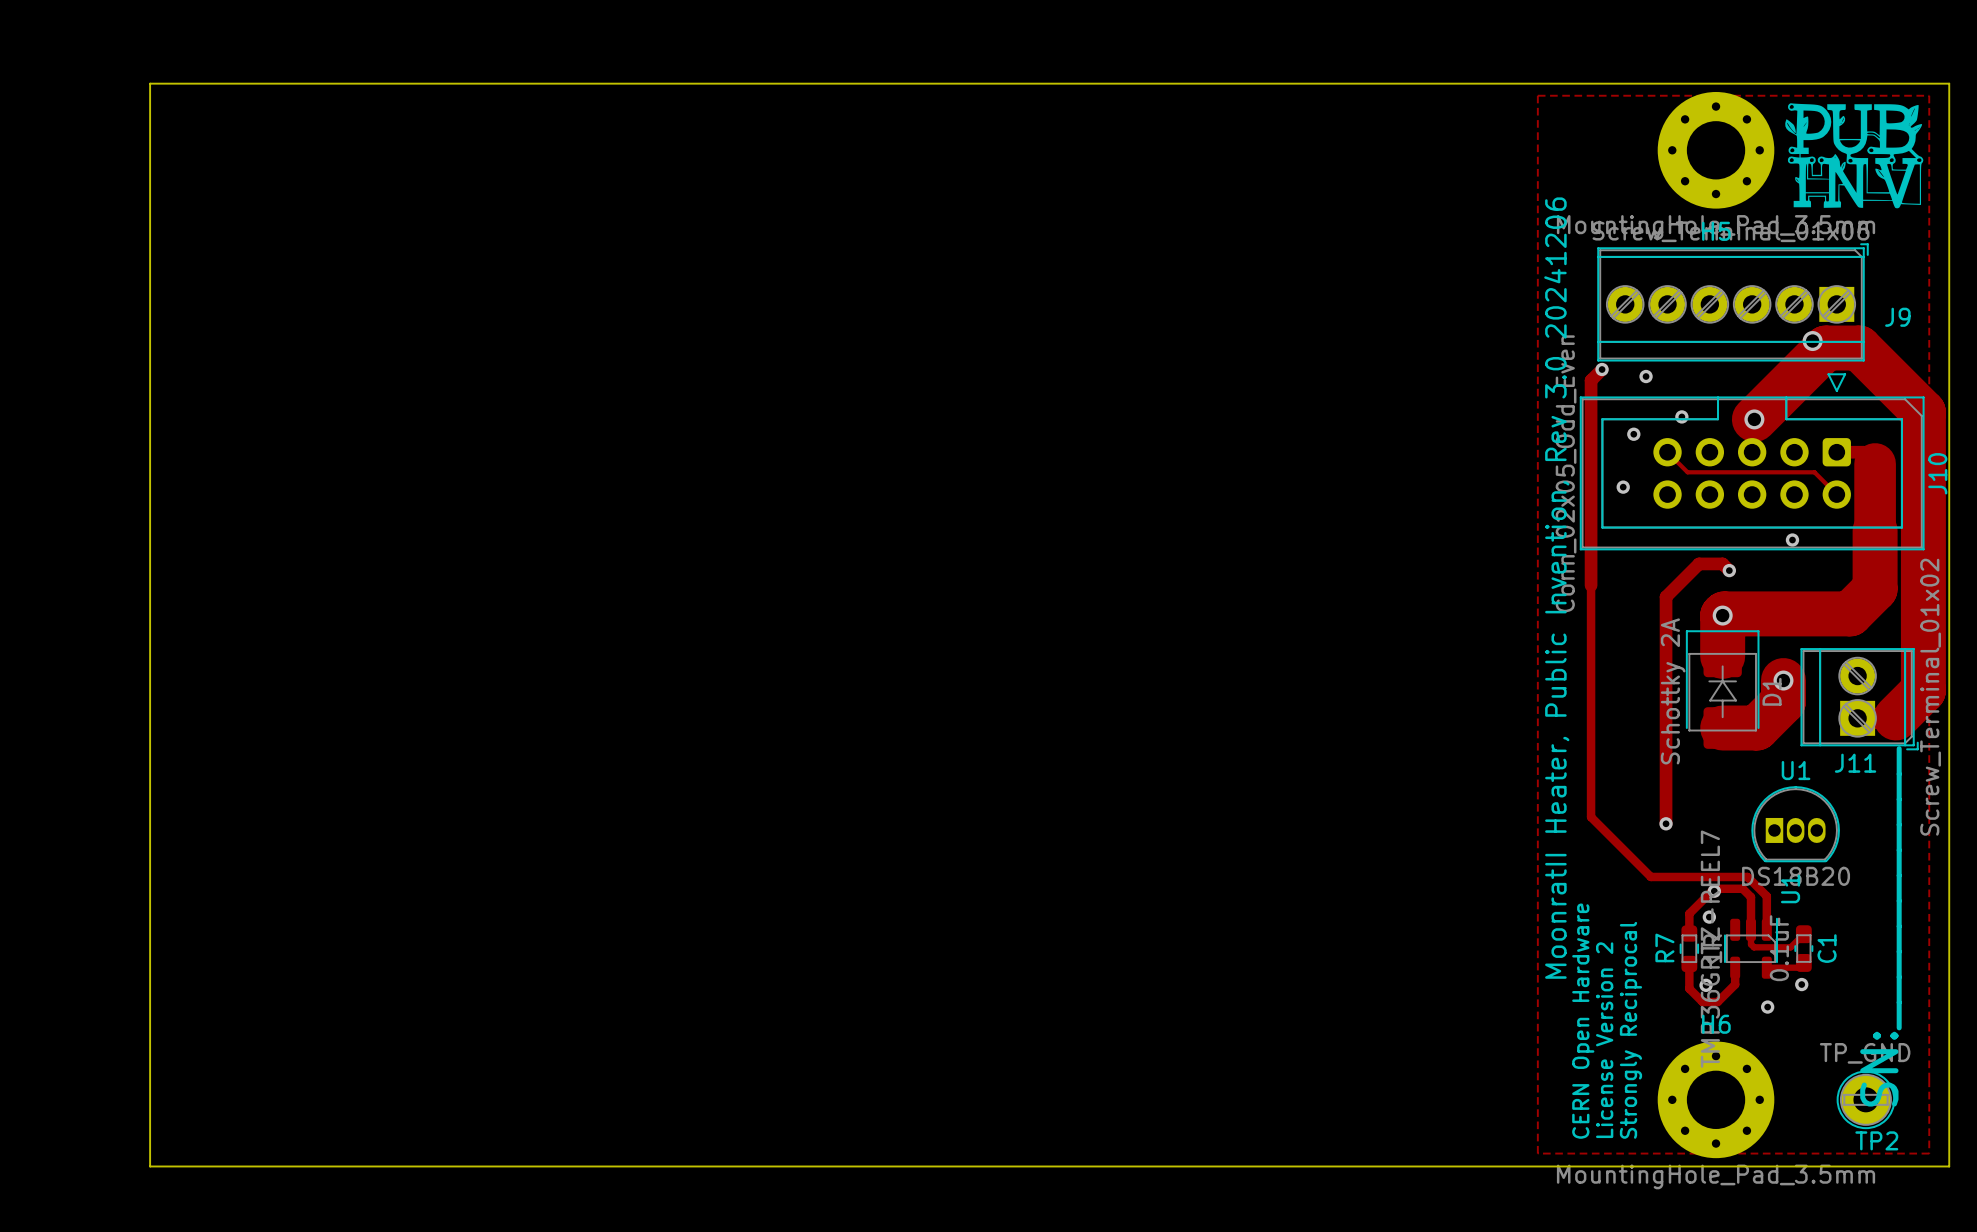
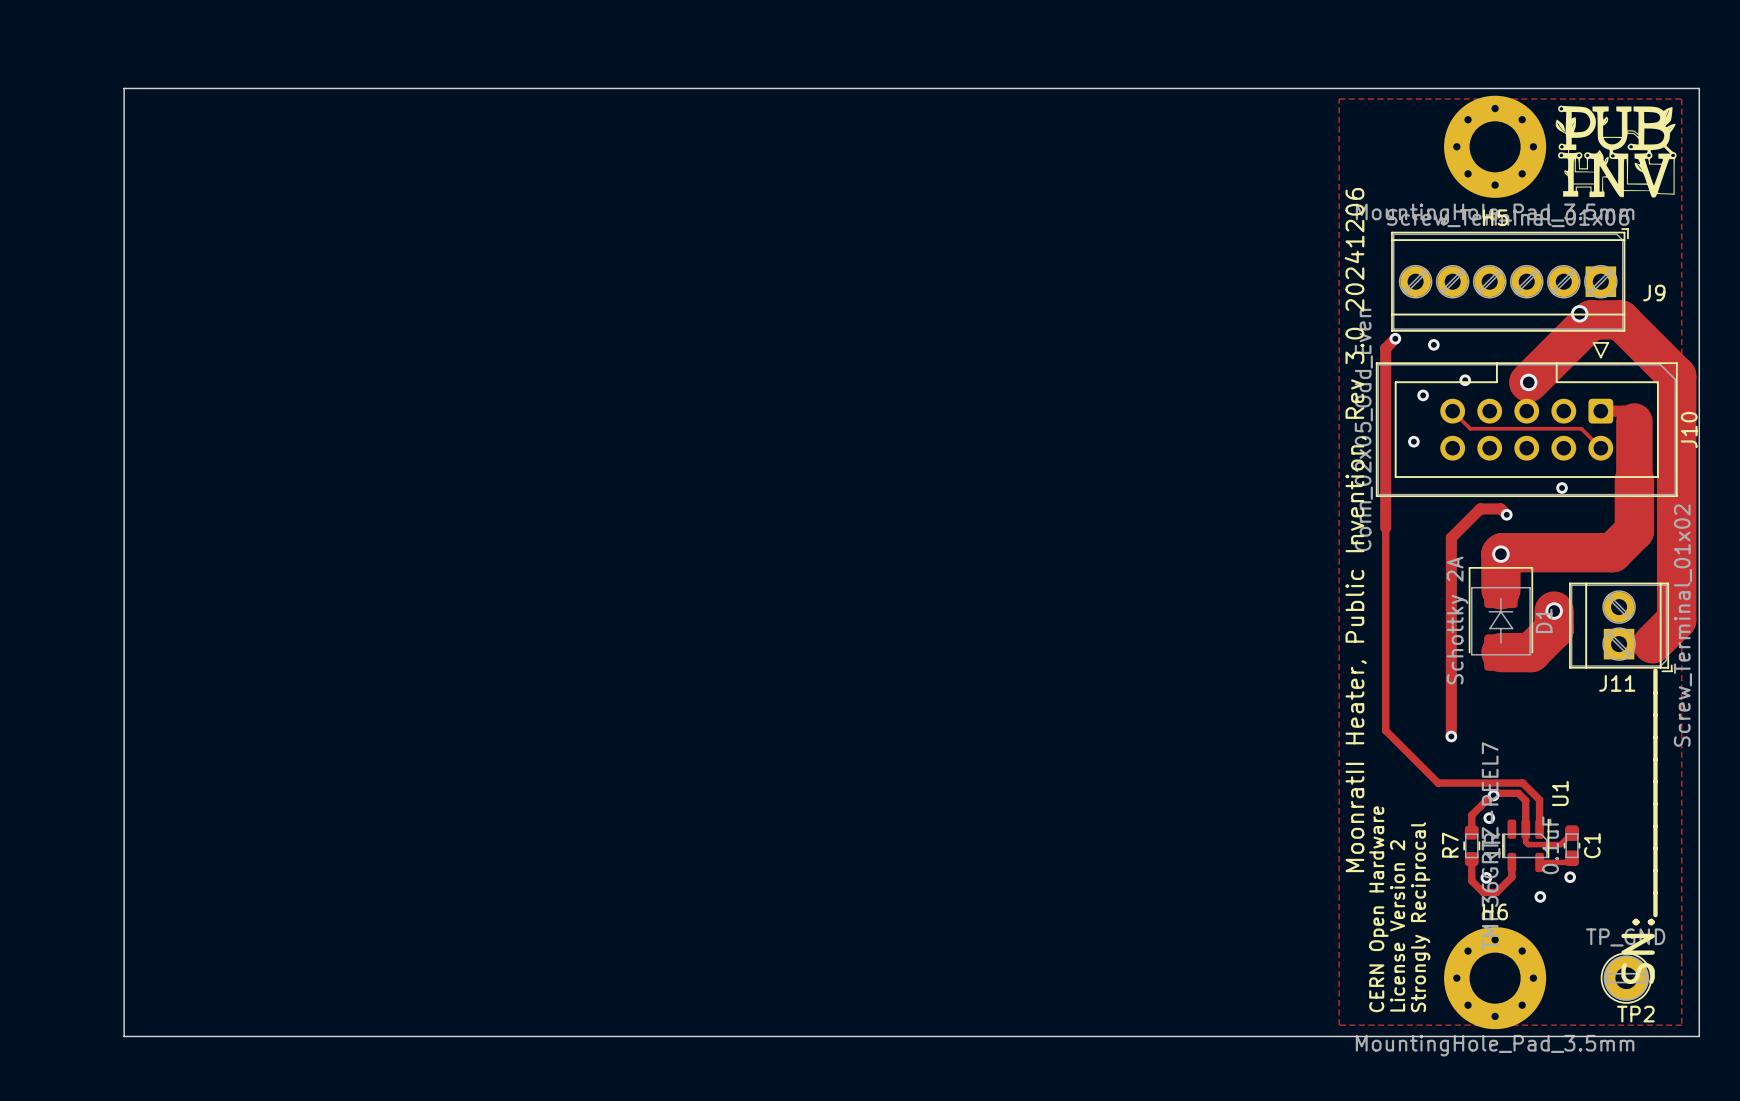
U1: DS18B20 (1795, 824) -> none

